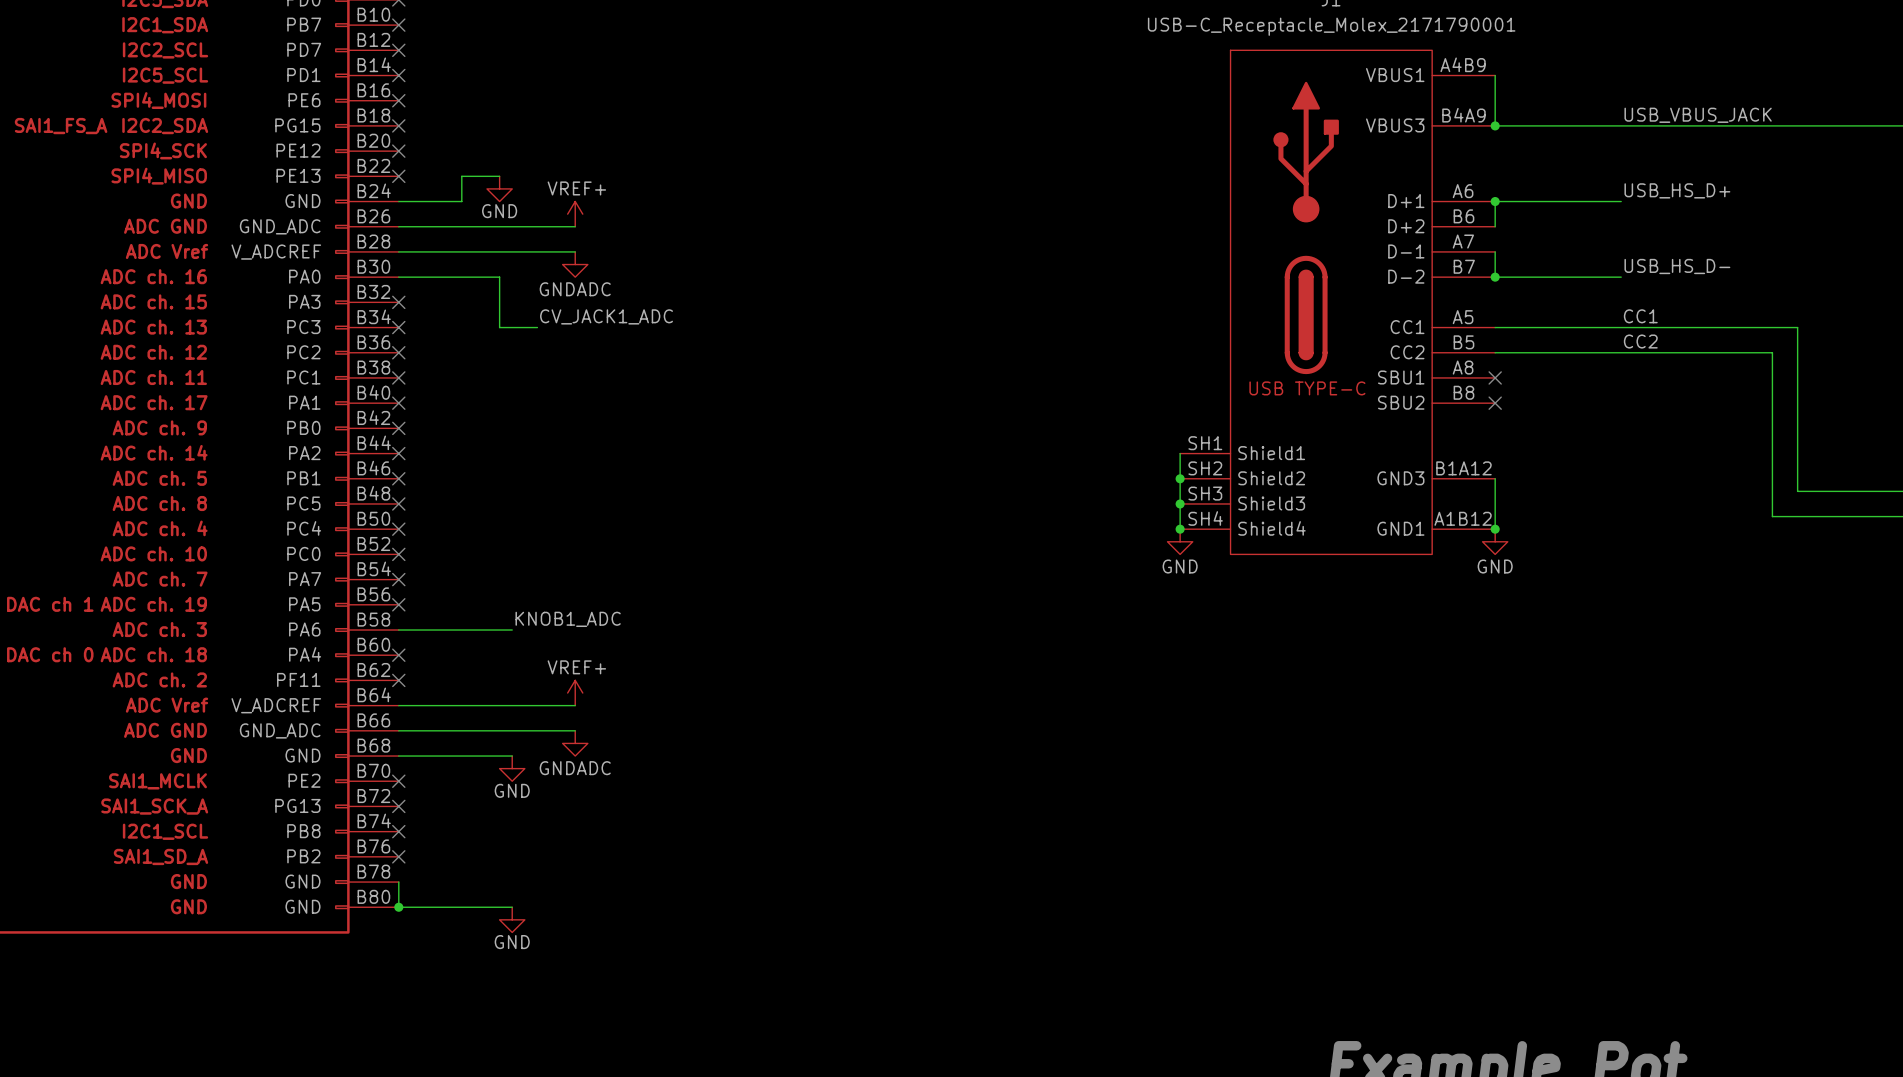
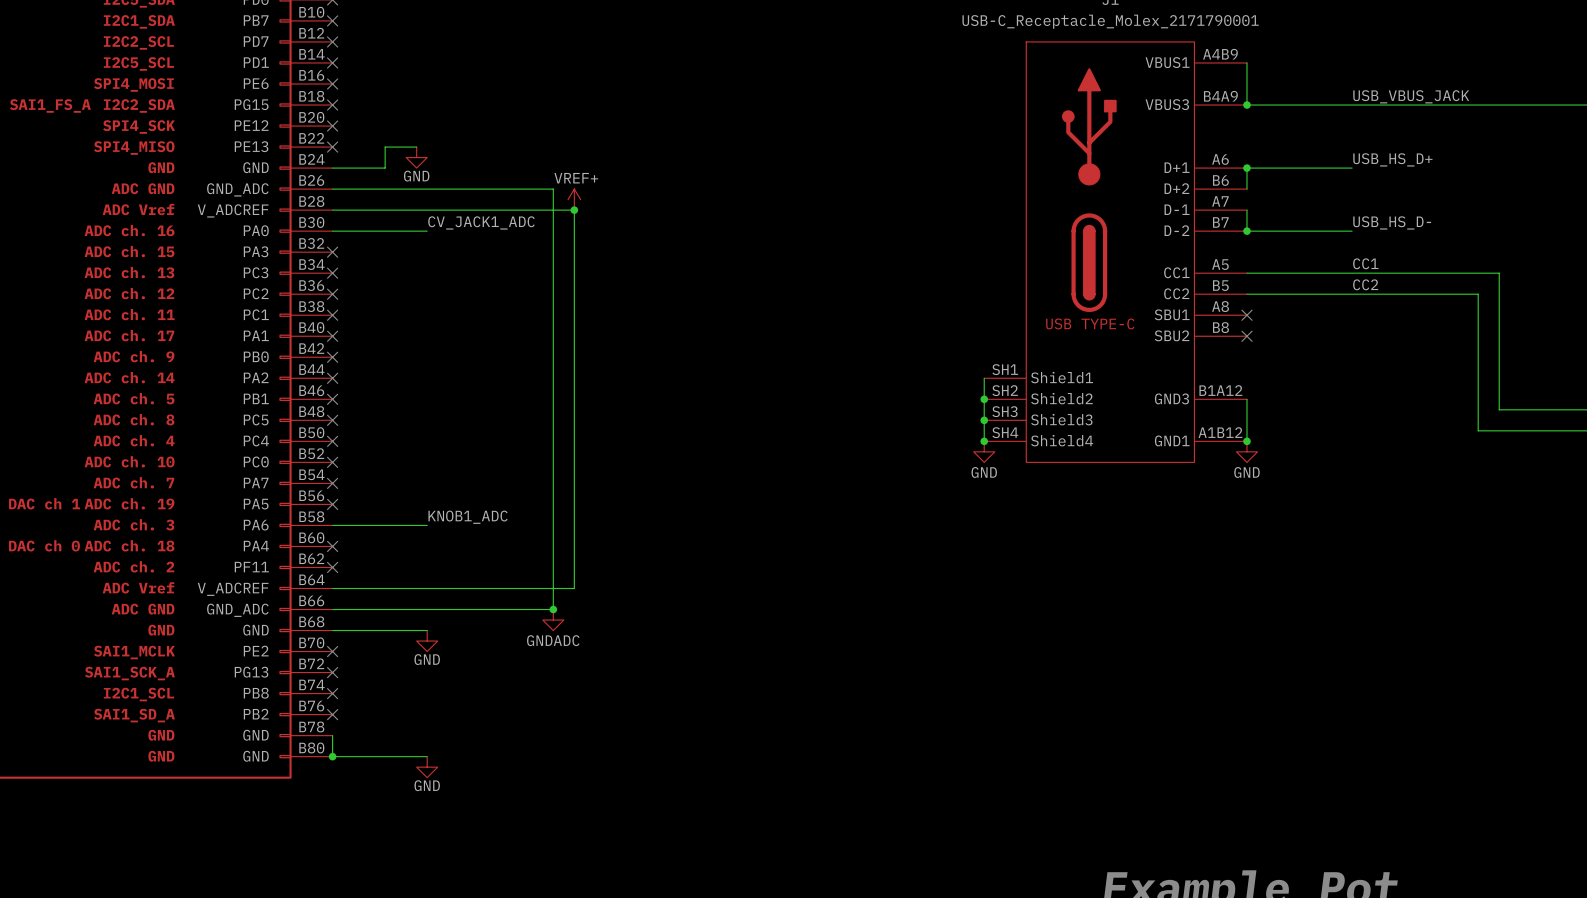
power symbol position: VREF+ (575, 214) -> VREF+ (574, 199)
wire: none -> (479, 189) (553, 189) (553, 609) (479, 609)
wire: none -> (479, 210) (574, 210) (574, 588) (479, 588)
junction: none -> (574, 210)
power symbol: GNDADC (575, 264) -> none
wire: (499, 277) (499, 327) (537, 327) -> (416, 231) (427, 231)
label position: CV_JACK1_ADC (606, 316) -> CV_JACK1_ADC (481, 222)
power symbol: VREF+ (575, 693) -> none
junction: none -> (553, 609)
power symbol position: GNDADC (575, 743) -> GNDADC (553, 620)

